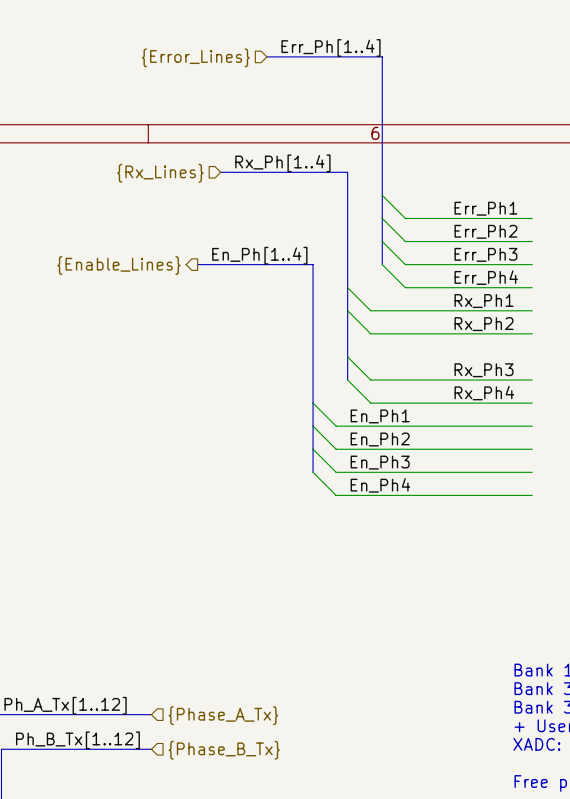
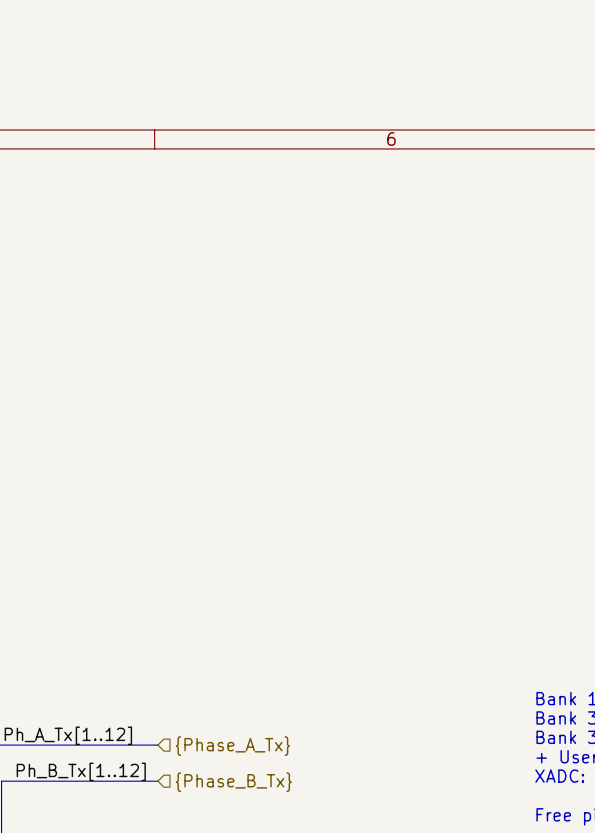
label: Err_Ph[1..4] (330, 47) -> none
bus: (266, 56) (382, 56) (382, 264) -> none
hierarchical label: {Error_Lines} (195, 57) -> none
label: Rx_Ph[1..4] (282, 163) -> none
bus: (220, 172) (347, 172) (347, 380) -> none
hierarchical label: {Rx_Lines} (160, 173) -> none
wire: (382, 195) (405, 218) (532, 218) -> none
label: Err_Ph1 (485, 208) -> none
wire: (382, 218) (405, 241) (532, 241) -> none
label: Err_Ph2 (485, 231) -> none
wire: (382, 241) (405, 264) (532, 264) -> none
label: Err_Ph3 (485, 254) -> none
label: En_Ph[1..4] (259, 255) -> none
bus: (197, 264) (313, 264) (313, 472) -> none
wire: (382, 264) (405, 287) (532, 287) -> none
hierarchical label: {Enable_Lines} (118, 265) -> none
label: Err_Ph4 (486, 277) -> none
wire: (347, 287) (370, 310) (532, 310) -> none
label: Rx_Ph1 (484, 301) -> none
wire: (347, 310) (370, 333) (532, 333) -> none
label: Rx_Ph2 (484, 324) -> none
wire: (347, 356) (370, 380) (532, 380) -> none
label: Rx_Ph3 (484, 370) -> none
wire: (347, 380) (370, 403) (532, 403) -> none
label: Rx_Ph4 (484, 393) -> none
wire: (313, 403) (336, 426) (532, 426) -> none
label: En_Ph1 (380, 416) -> none
wire: (313, 426) (336, 449) (532, 449) -> none
label: En_Ph2 (380, 439) -> none
wire: (313, 449) (336, 472) (532, 472) -> none
label: En_Ph3 (380, 462) -> none
wire: (313, 472) (336, 495) (532, 495) -> none
label: En_Ph4 (380, 485) -> none

